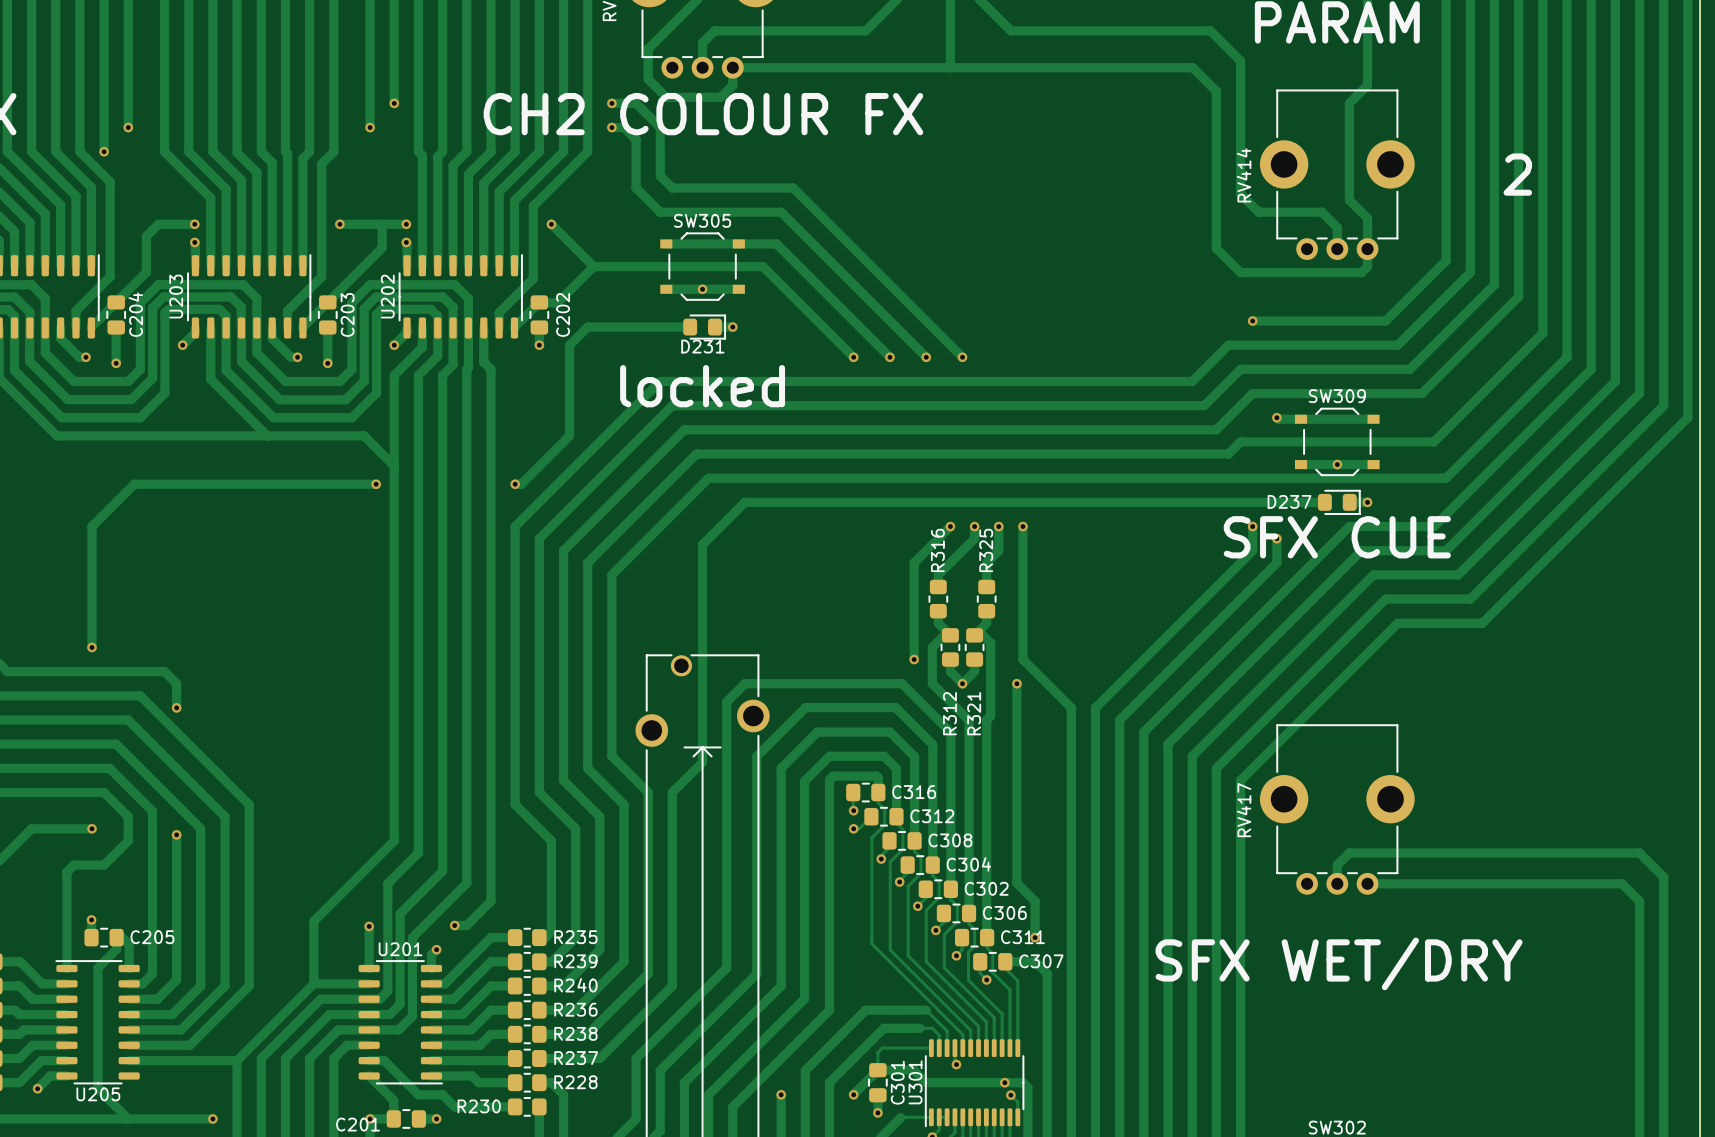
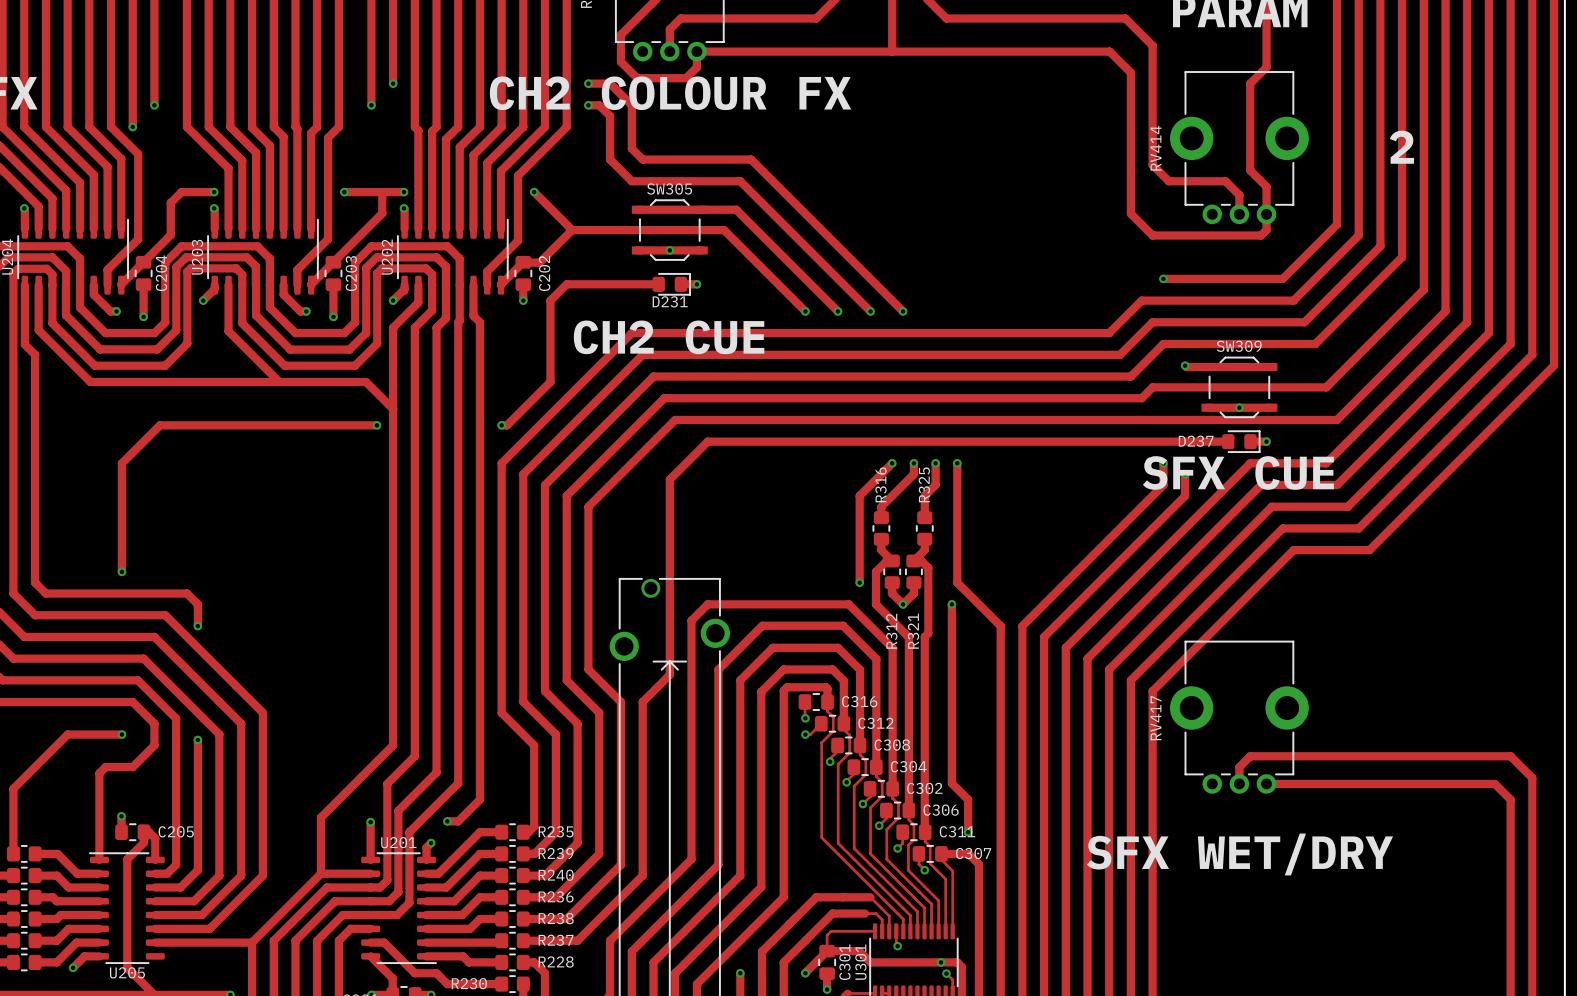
text: locked (702, 386) -> CH2 CUE (669, 337)

